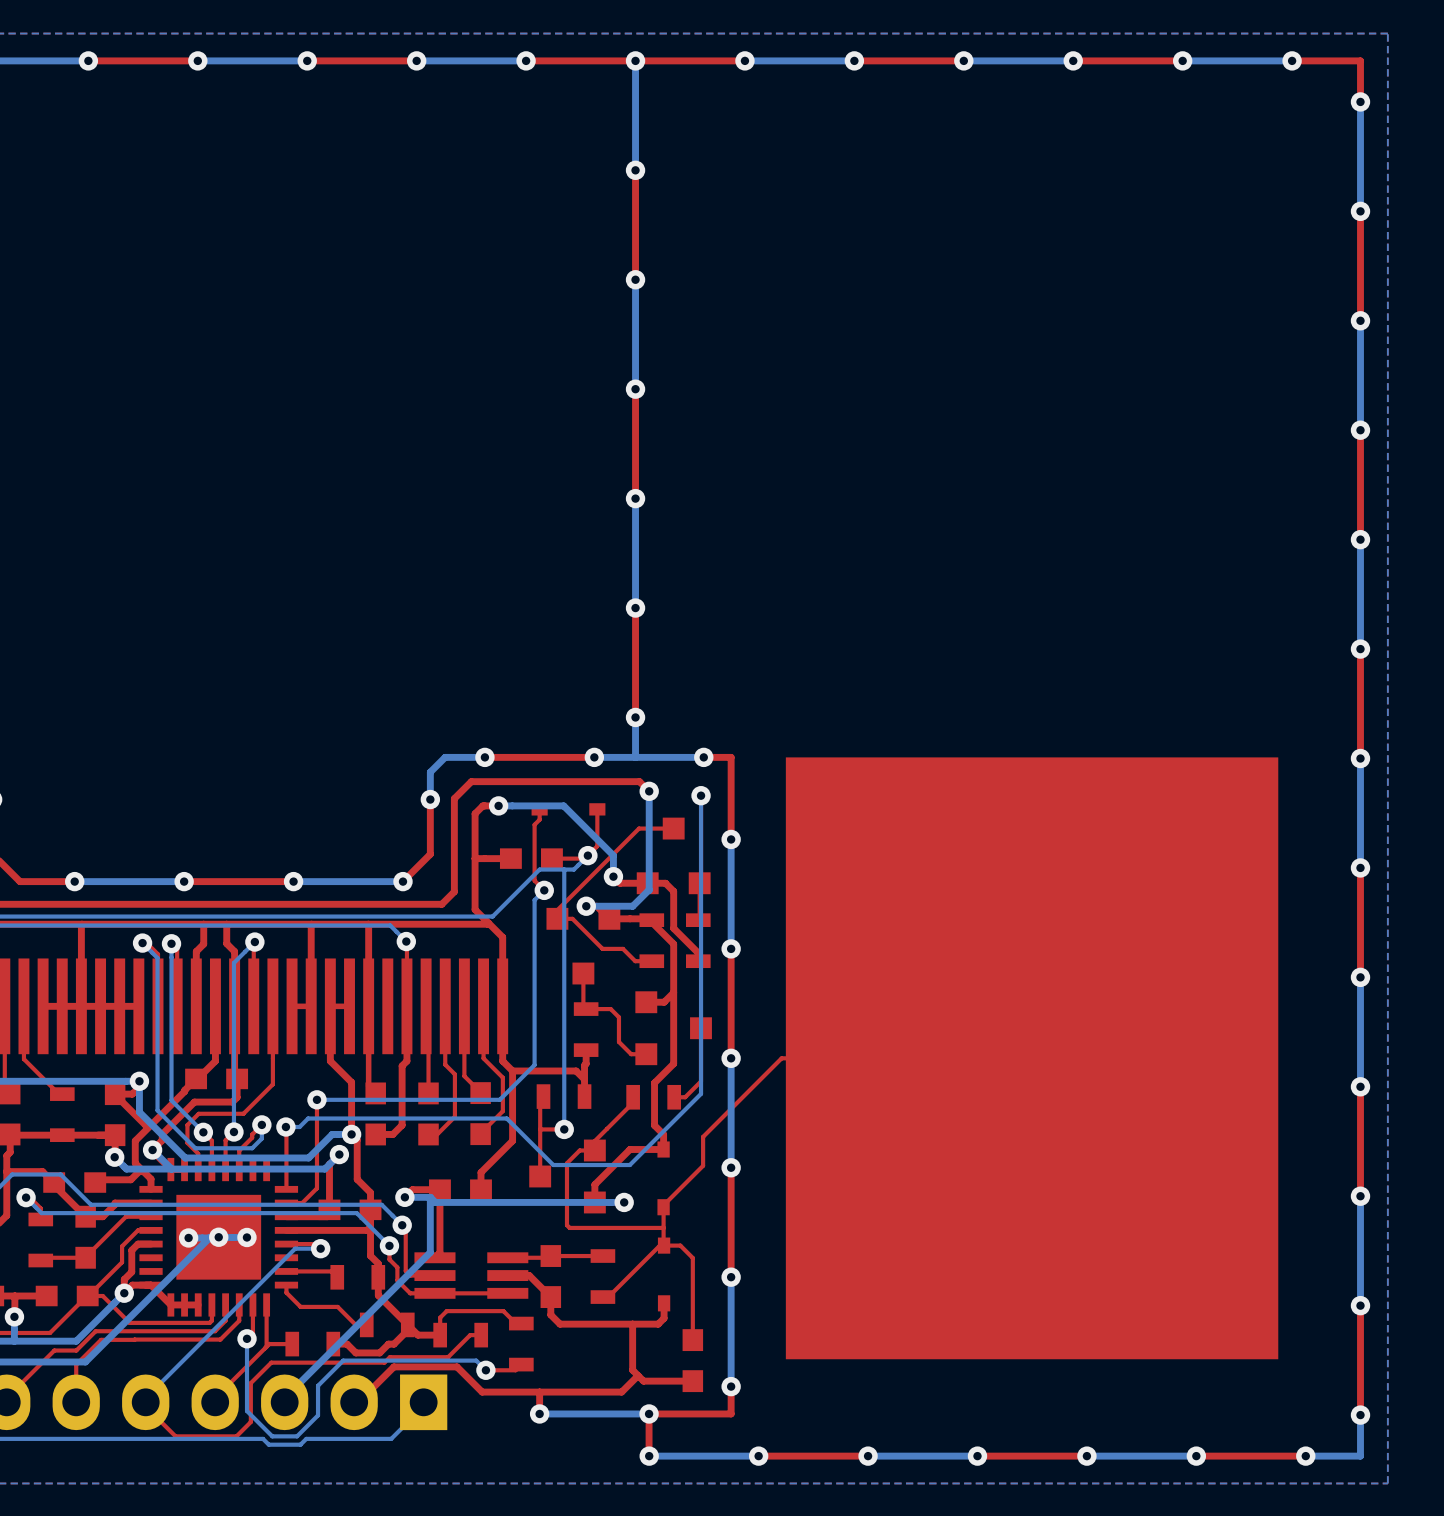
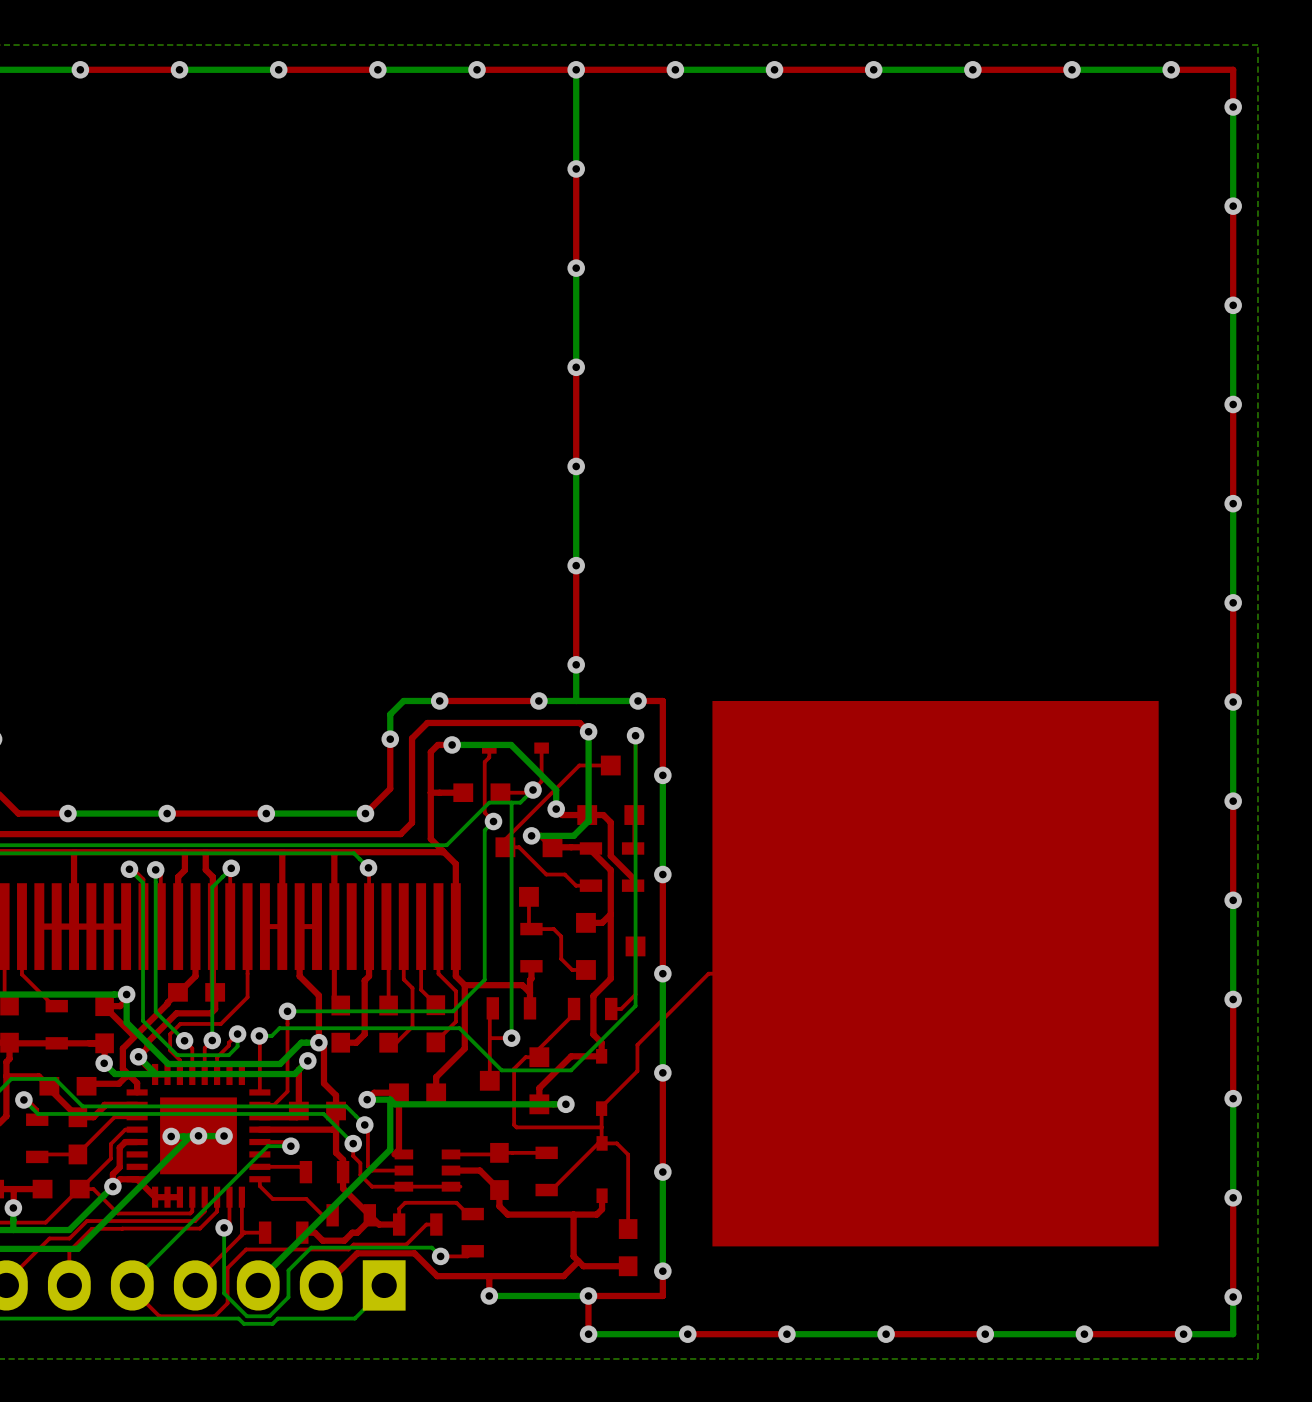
part footprint: [414, 1252, 529, 1299] -> [394, 1149, 461, 1192]

